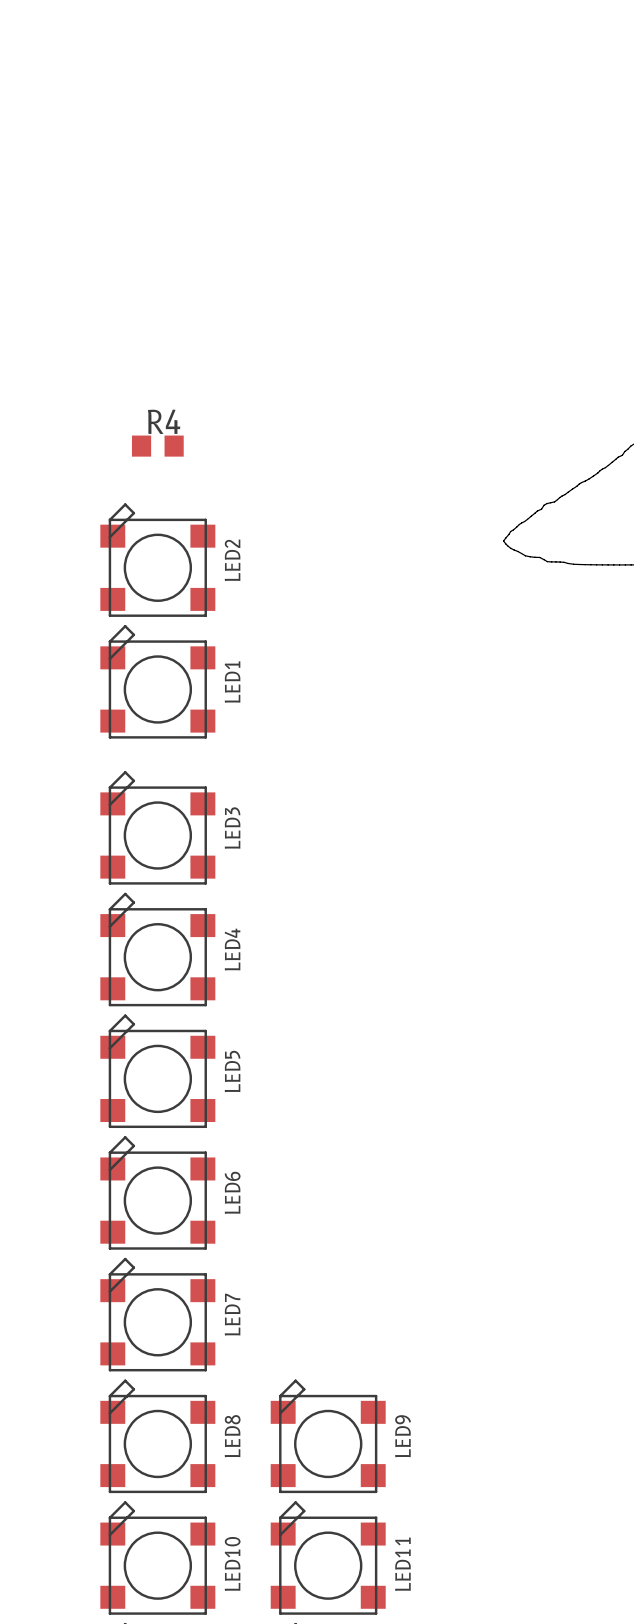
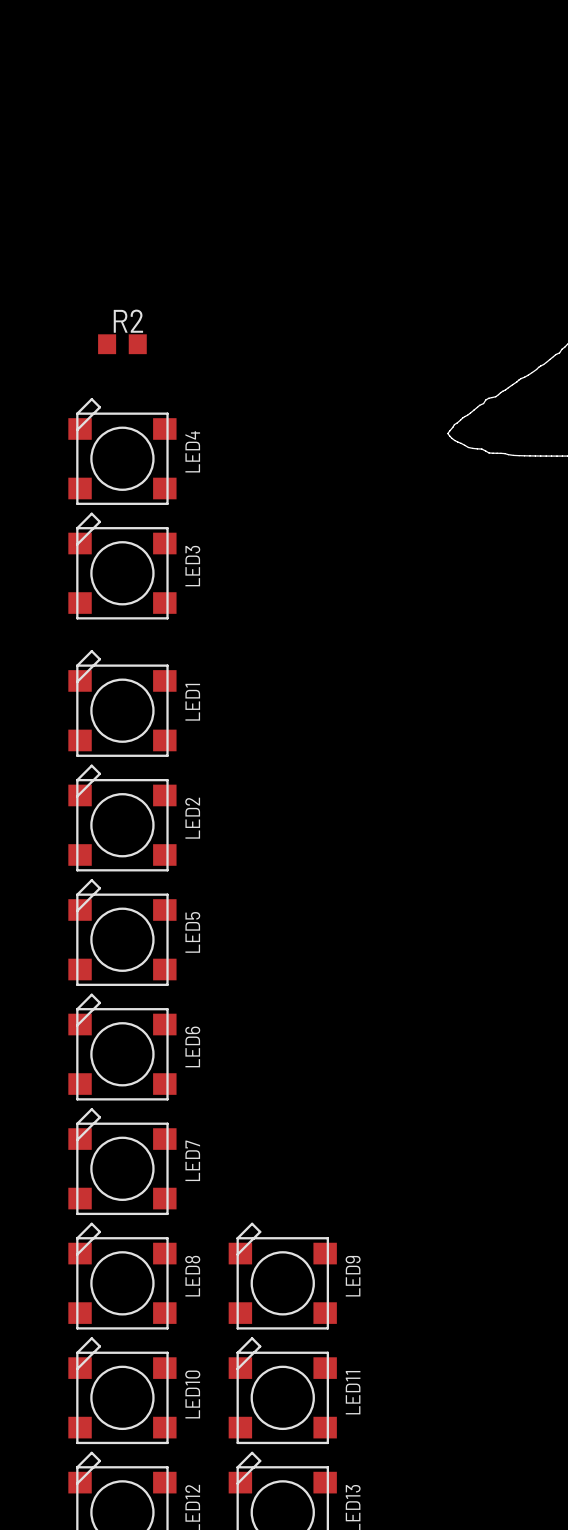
R4 name: R4 (164, 421) -> R2 (128, 321)
LED2 name: LED2 (232, 560) -> LED4 (192, 451)
LED1 name: LED1 (232, 682) -> LED3 (192, 566)
LED3 name: LED3 (232, 828) -> LED1 (192, 702)
LED4 name: LED4 (232, 949) -> LED2 (192, 818)

